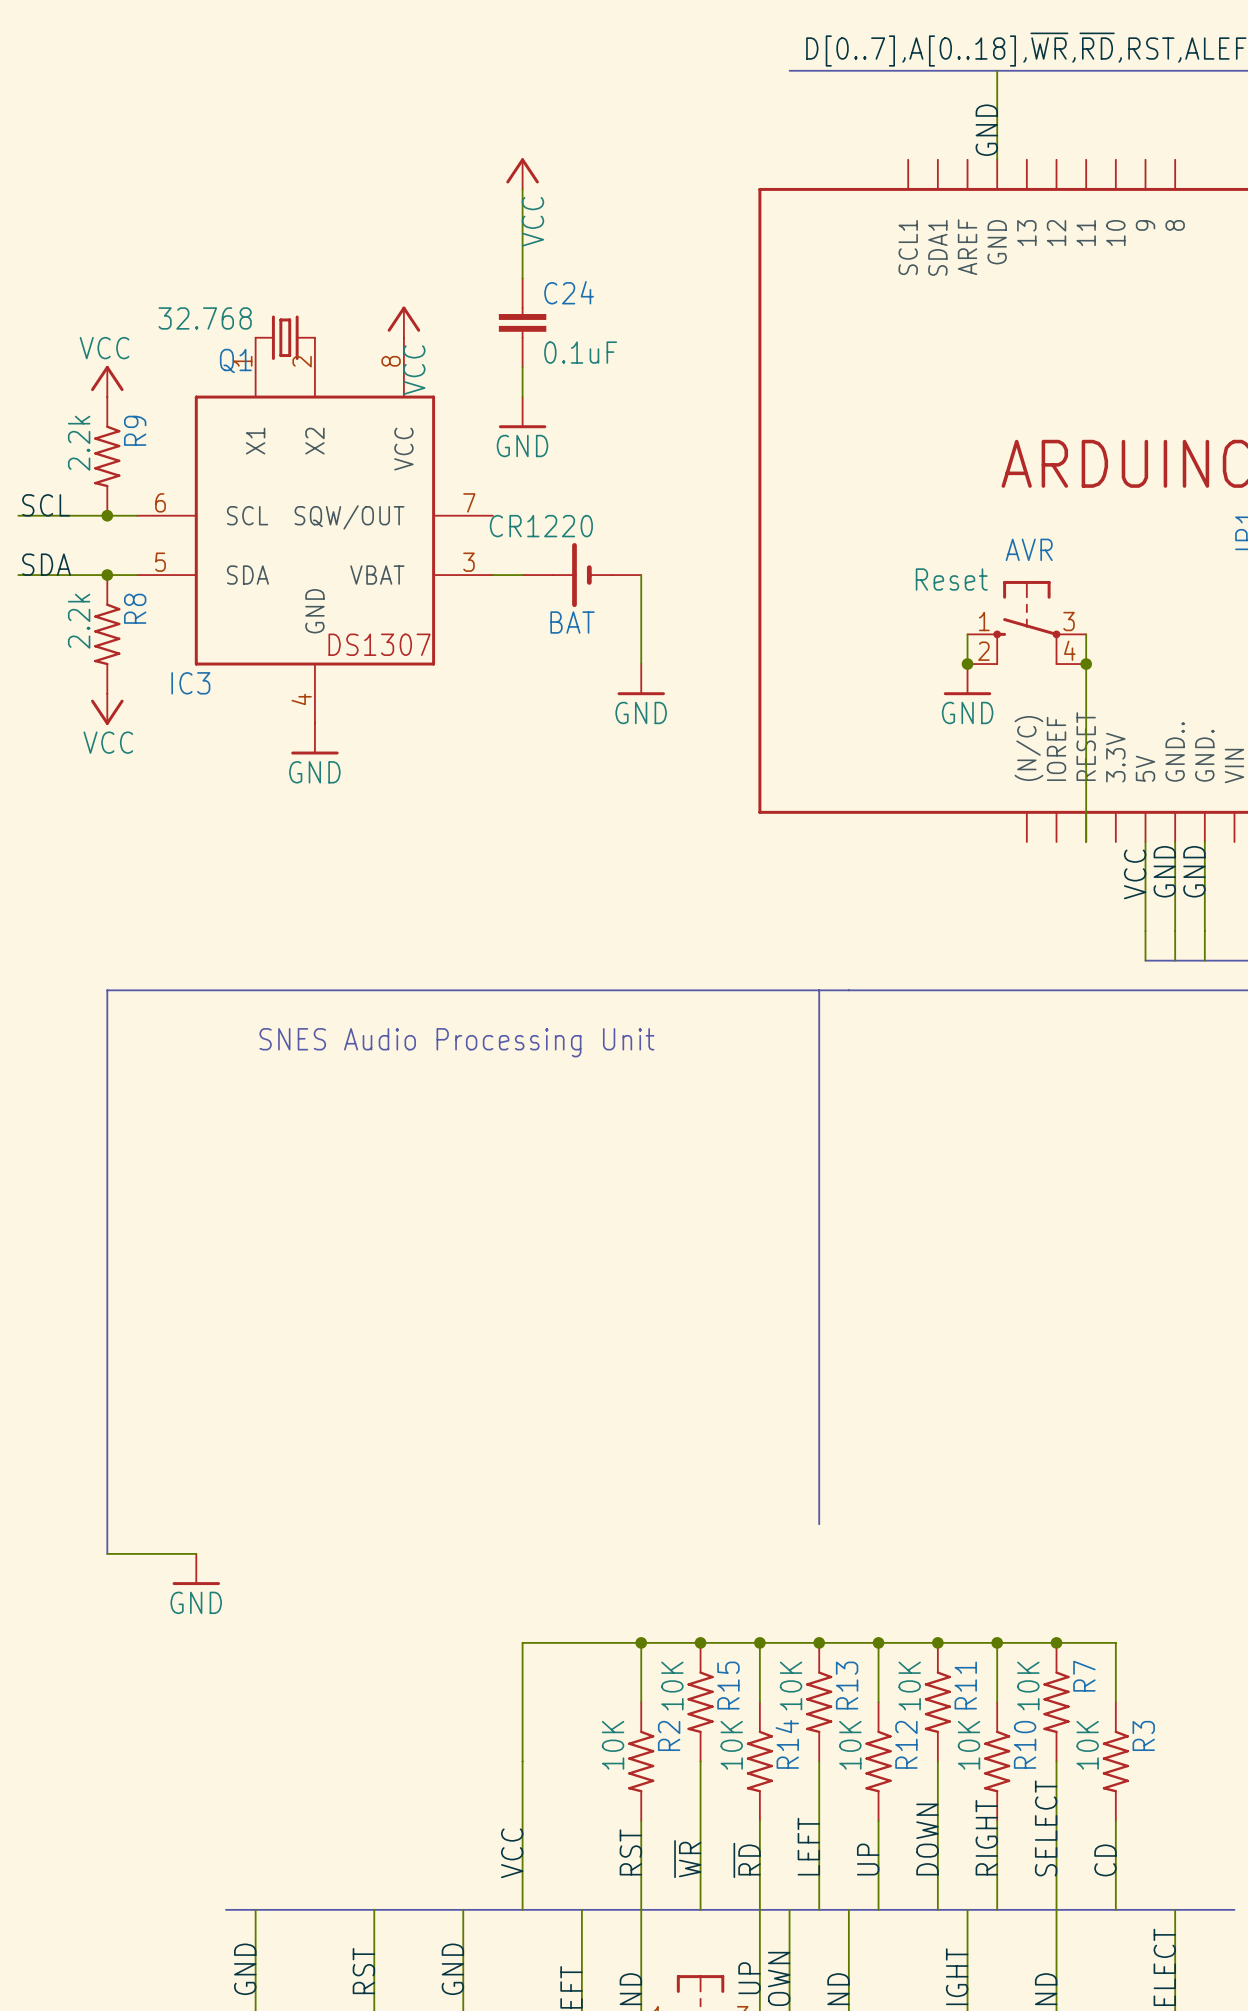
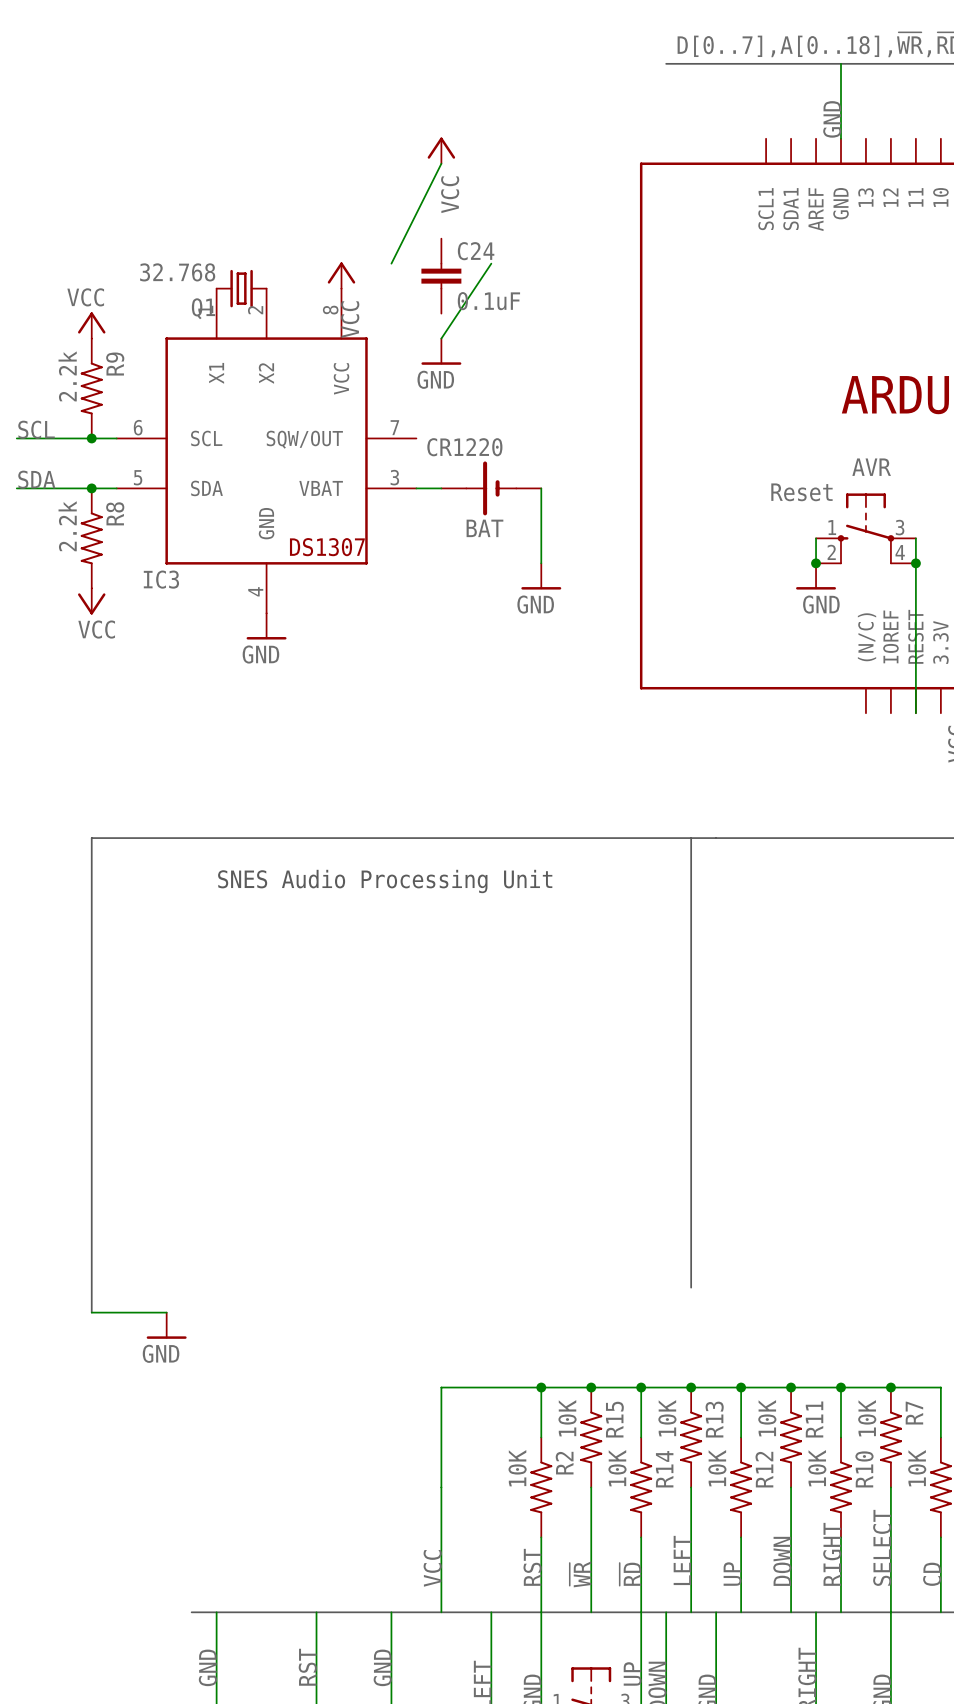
wire: (522, 189) (522, 278) -> (441, 163) (391, 263)
wire: (522, 367) (522, 397) -> (491, 263) (441, 338)

